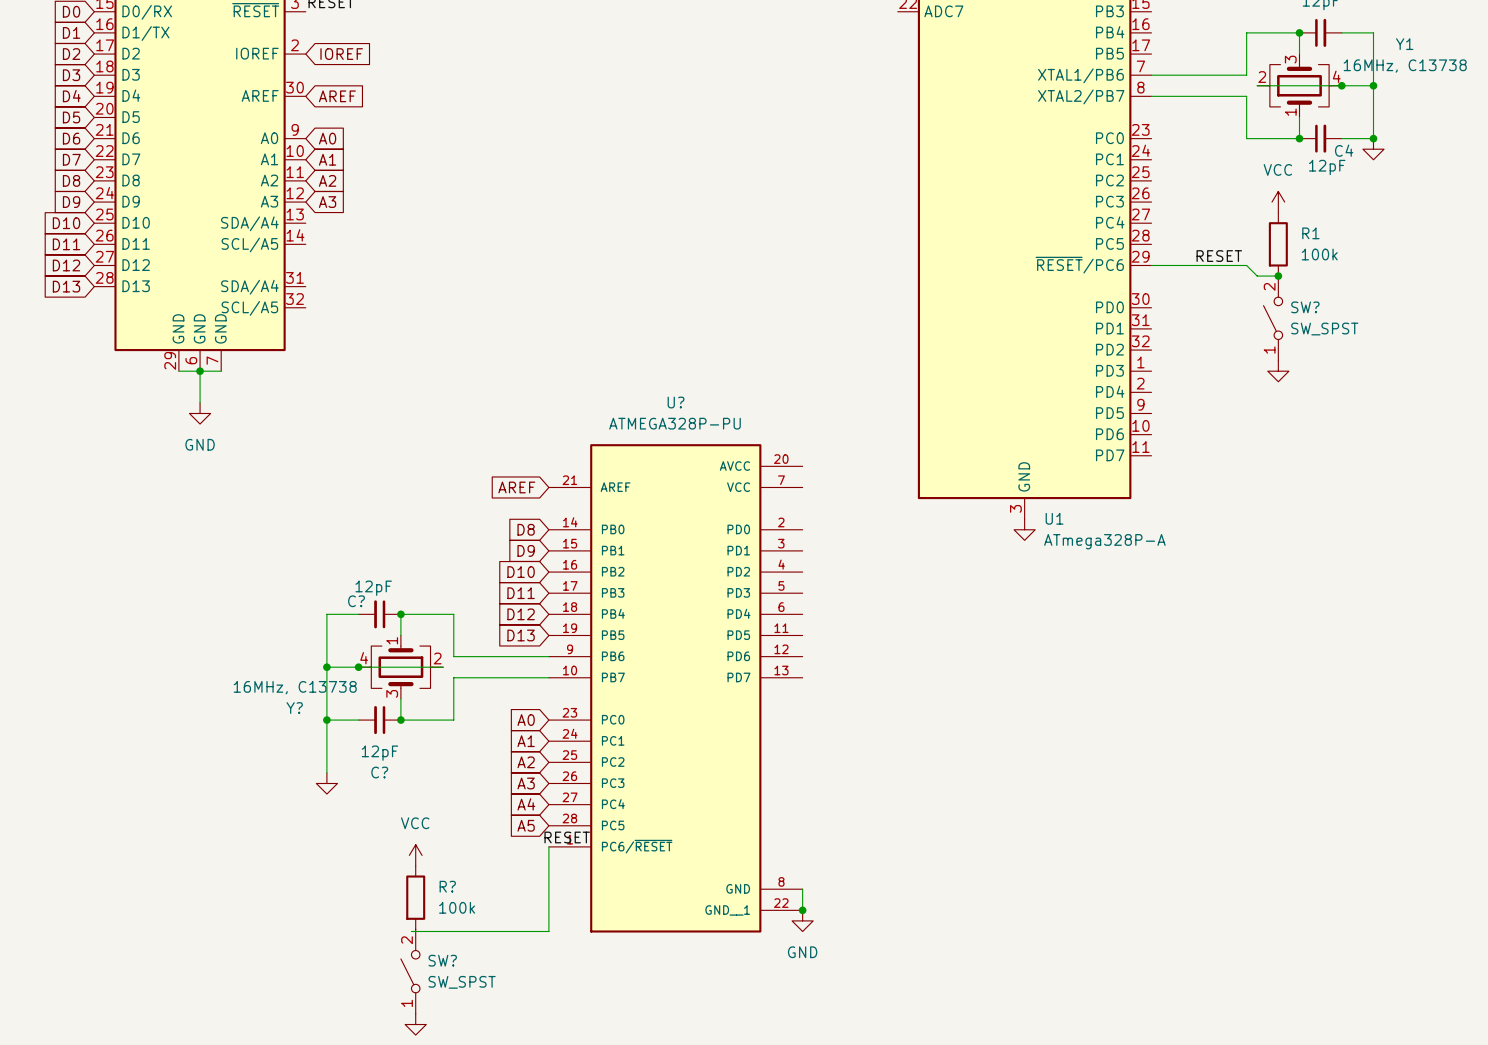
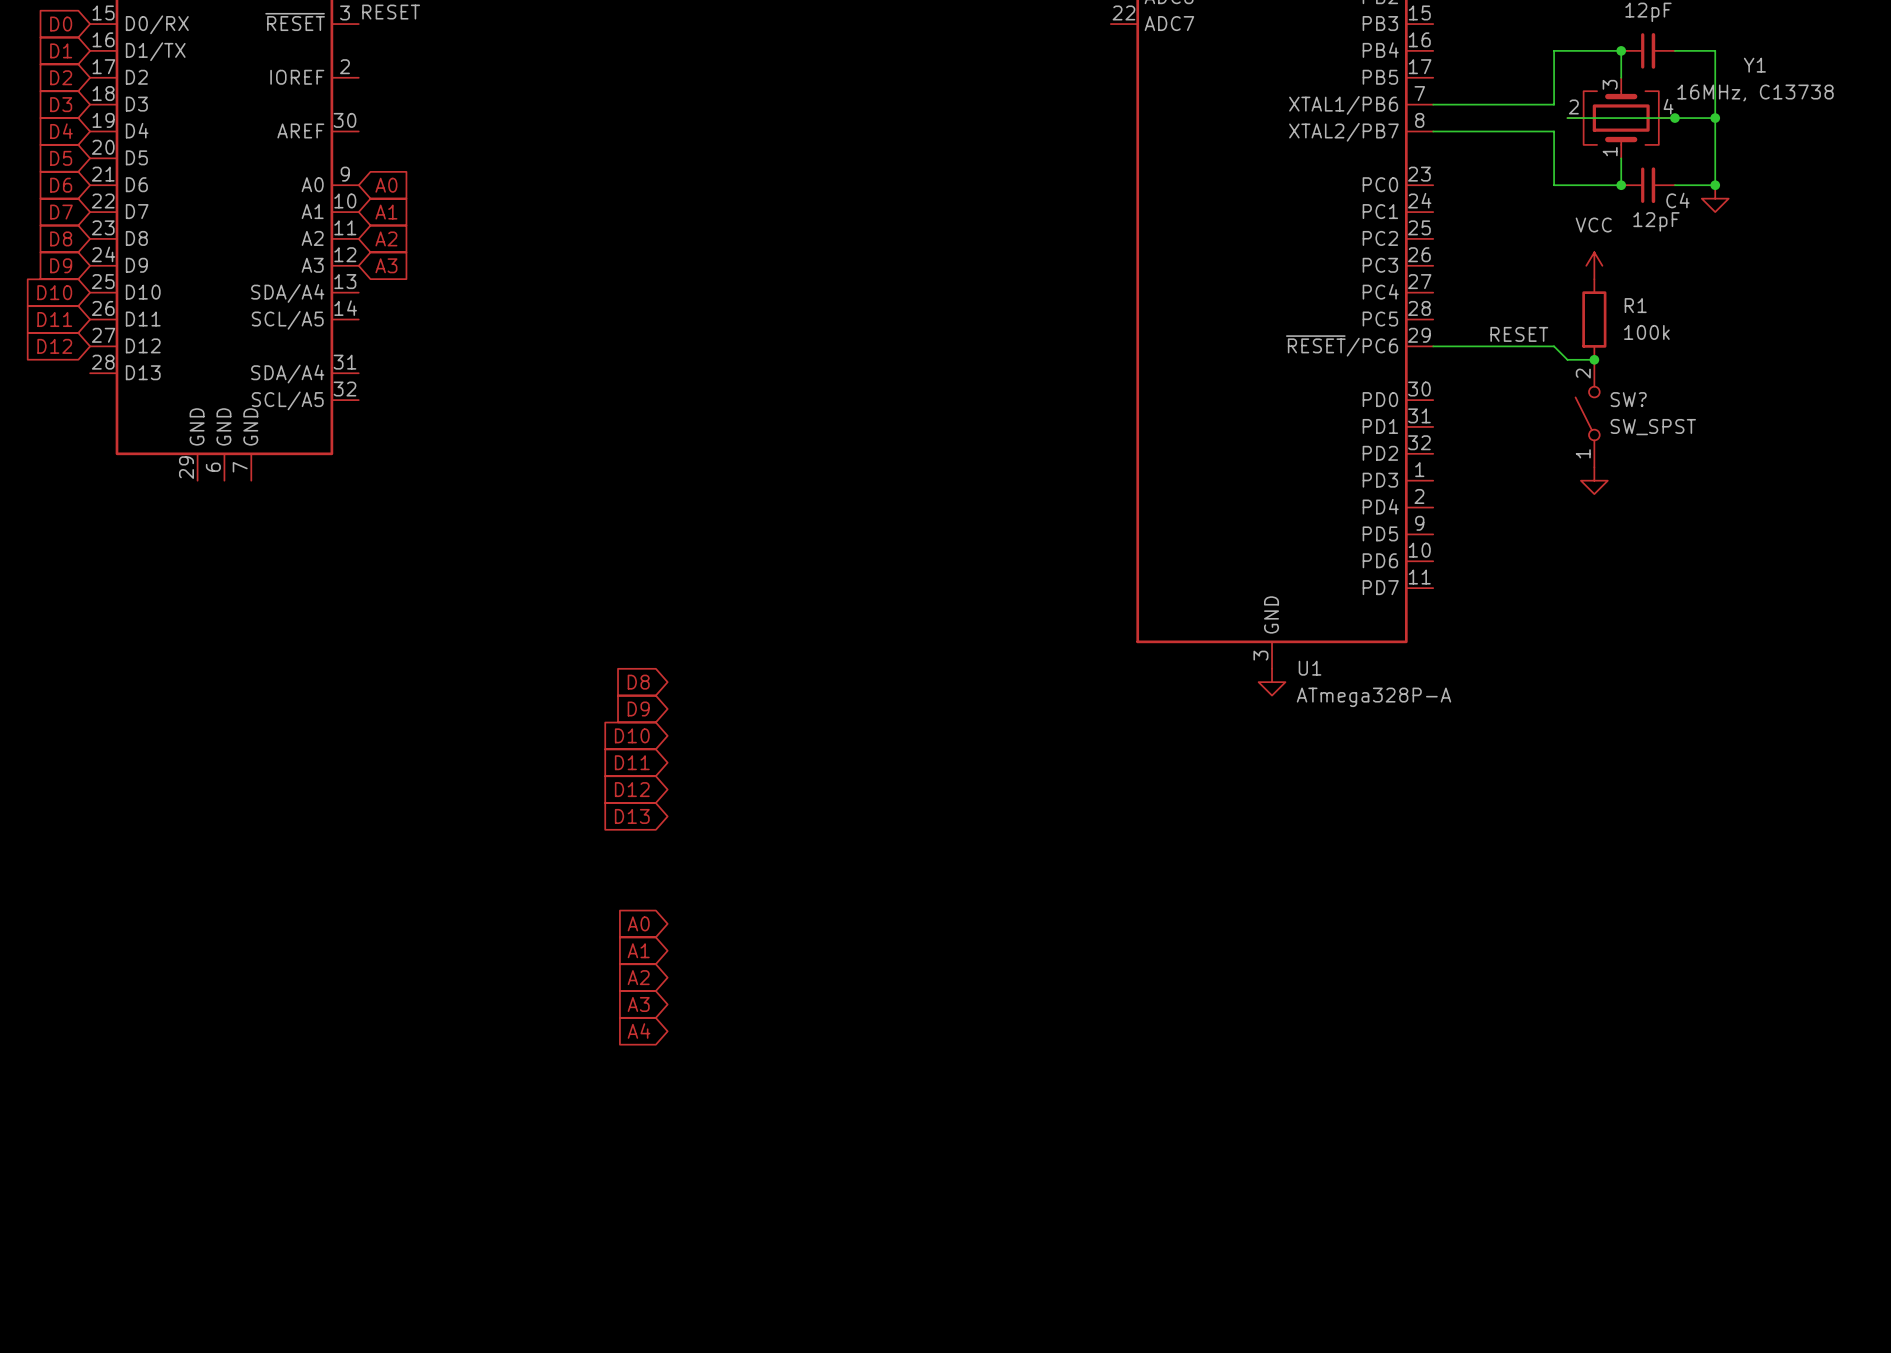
global label: IOREF (341, 54) -> none
global label: AREF (337, 96) -> none
global label: D13 (66, 286) -> none
wire: (178, 371) (221, 371) -> none
wire: (200, 371) (200, 402) -> none
junction: (200, 371) -> none
power symbol: GND (200, 413) -> none
global label: AREF (516, 487) -> none
wire: (358, 614) (326, 614) (326, 772) -> none
C?: 12pF (379, 614) -> none
junction: (400, 614) -> none
wire: (400, 635) (400, 614) (453, 614) (453, 656) (548, 656) -> none
wire: (326, 667) (443, 667) -> none
junction: (326, 667) -> none
junction: (358, 667) -> none
Y?: 16MHz, C13738 (400, 667) -> none
wire: (548, 677) (453, 677) (453, 720) (400, 720) (400, 698) -> none
U?: ATMEGA328P-PU (675, 688) -> none
wire: (326, 720) (358, 720) -> none
junction: (326, 720) -> none
C?: 12pF (379, 720) -> none
junction: (400, 720) -> none
power symbol: (326, 783) -> none
global label: A5 (526, 825) -> none
label: RESET (567, 837) -> none
wire: (548, 846) (548, 931) (411, 931) -> none
power symbol: VCC (415, 855) -> none
wire: (802, 889) (802, 910) -> none
R?: 100k (415, 897) -> none
junction: (802, 910) -> none
power symbol: GND (802, 920) -> none
SW?: SW_SPST (410, 971) -> none
power symbol: (415, 1024) -> none

